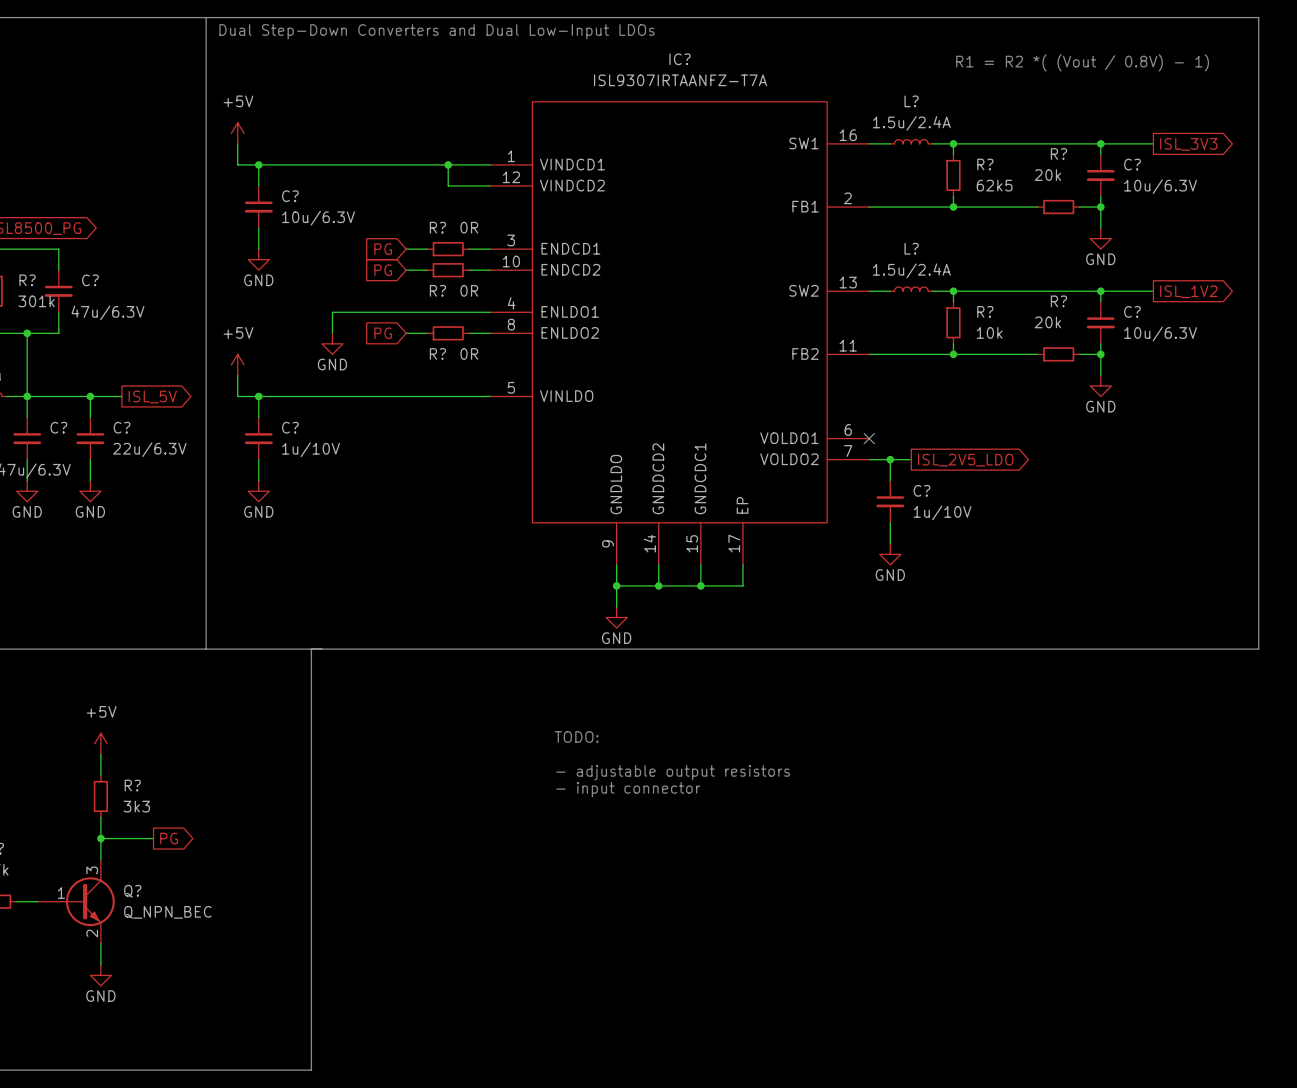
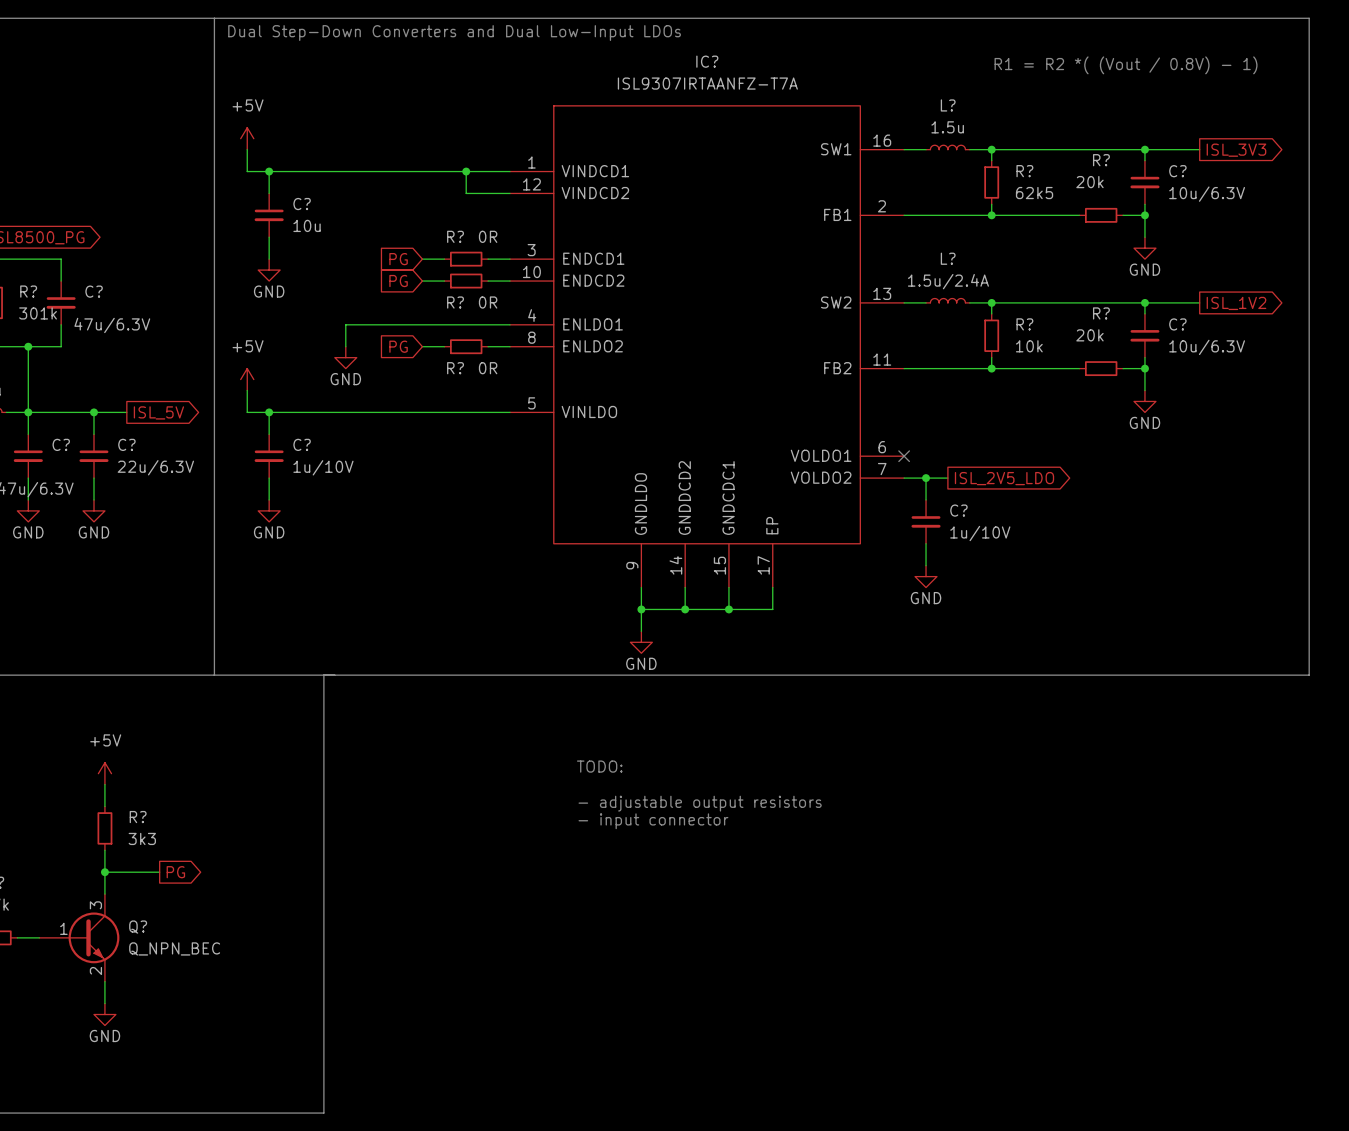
L? value: 1.5u/2.4A (911, 123) -> 1.5u (947, 127)
C? value: 10u/6.3V (318, 218) -> 10u (307, 225)

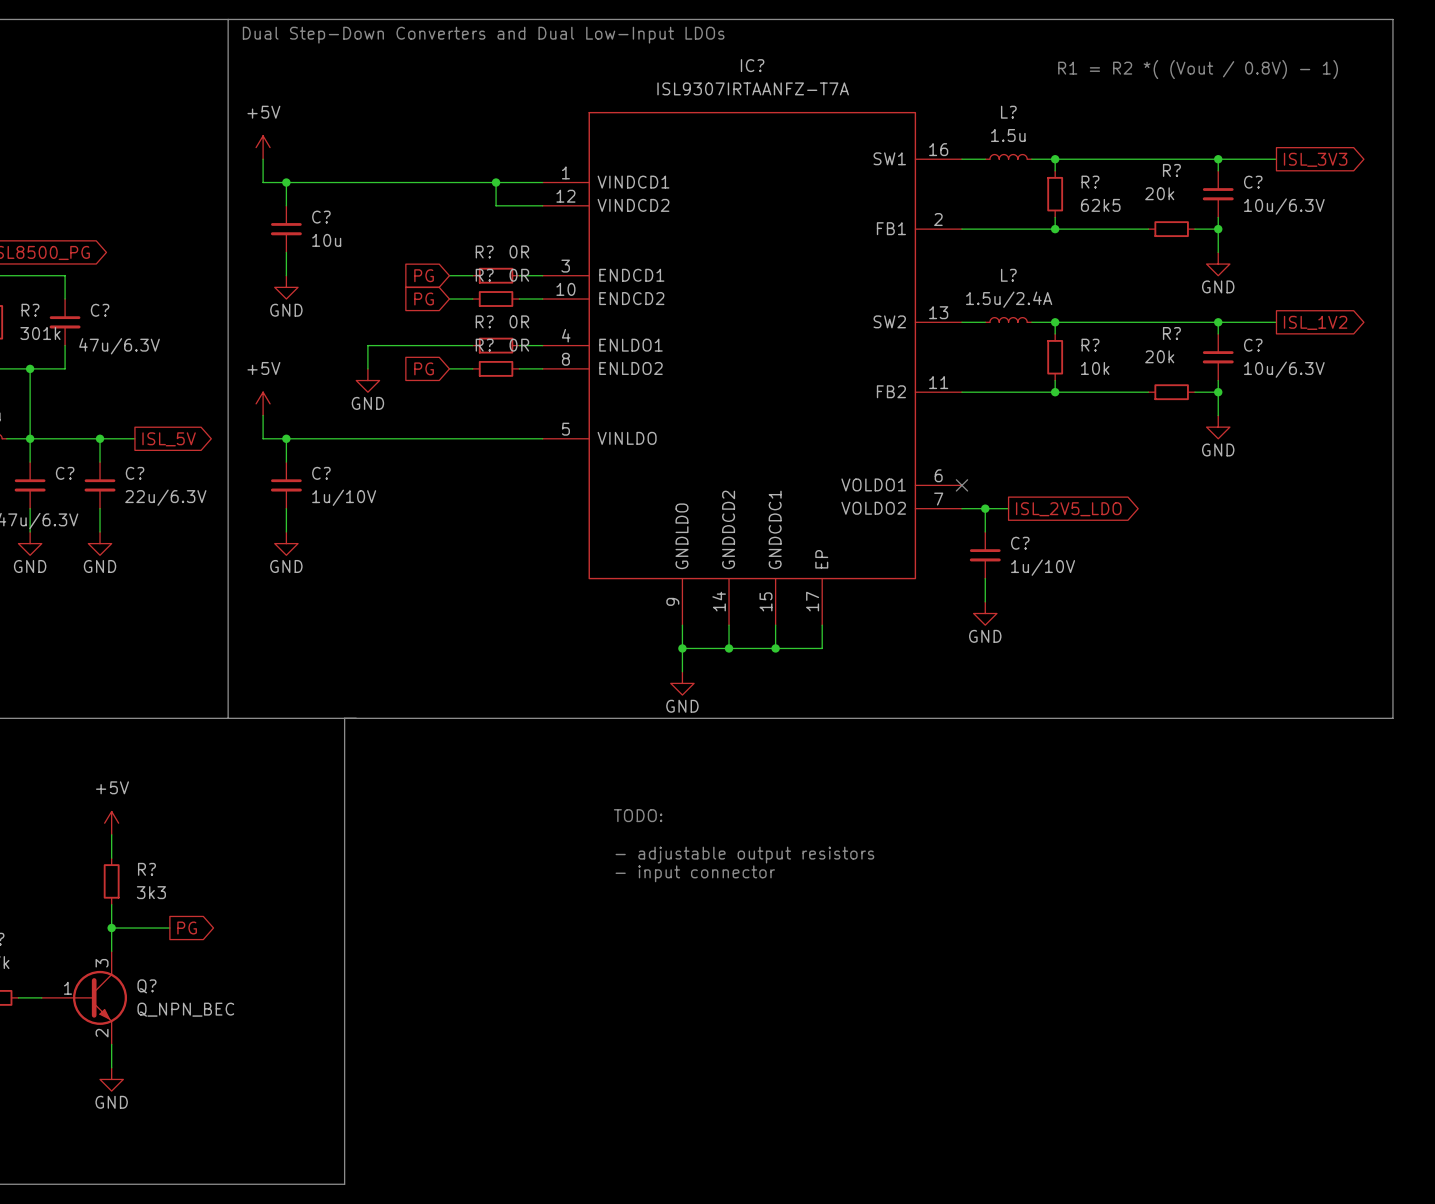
R? name position: R? (455, 302) -> R? (484, 275)
R? value position: 0R (488, 302) -> 0R (519, 275)
wire: (444, 324) (488, 324) -> none
R?: none -> 0R (496, 345)
R? name position: R? (455, 368) -> R? (484, 345)
R? value position: 0R (488, 368) -> 0R (519, 345)

